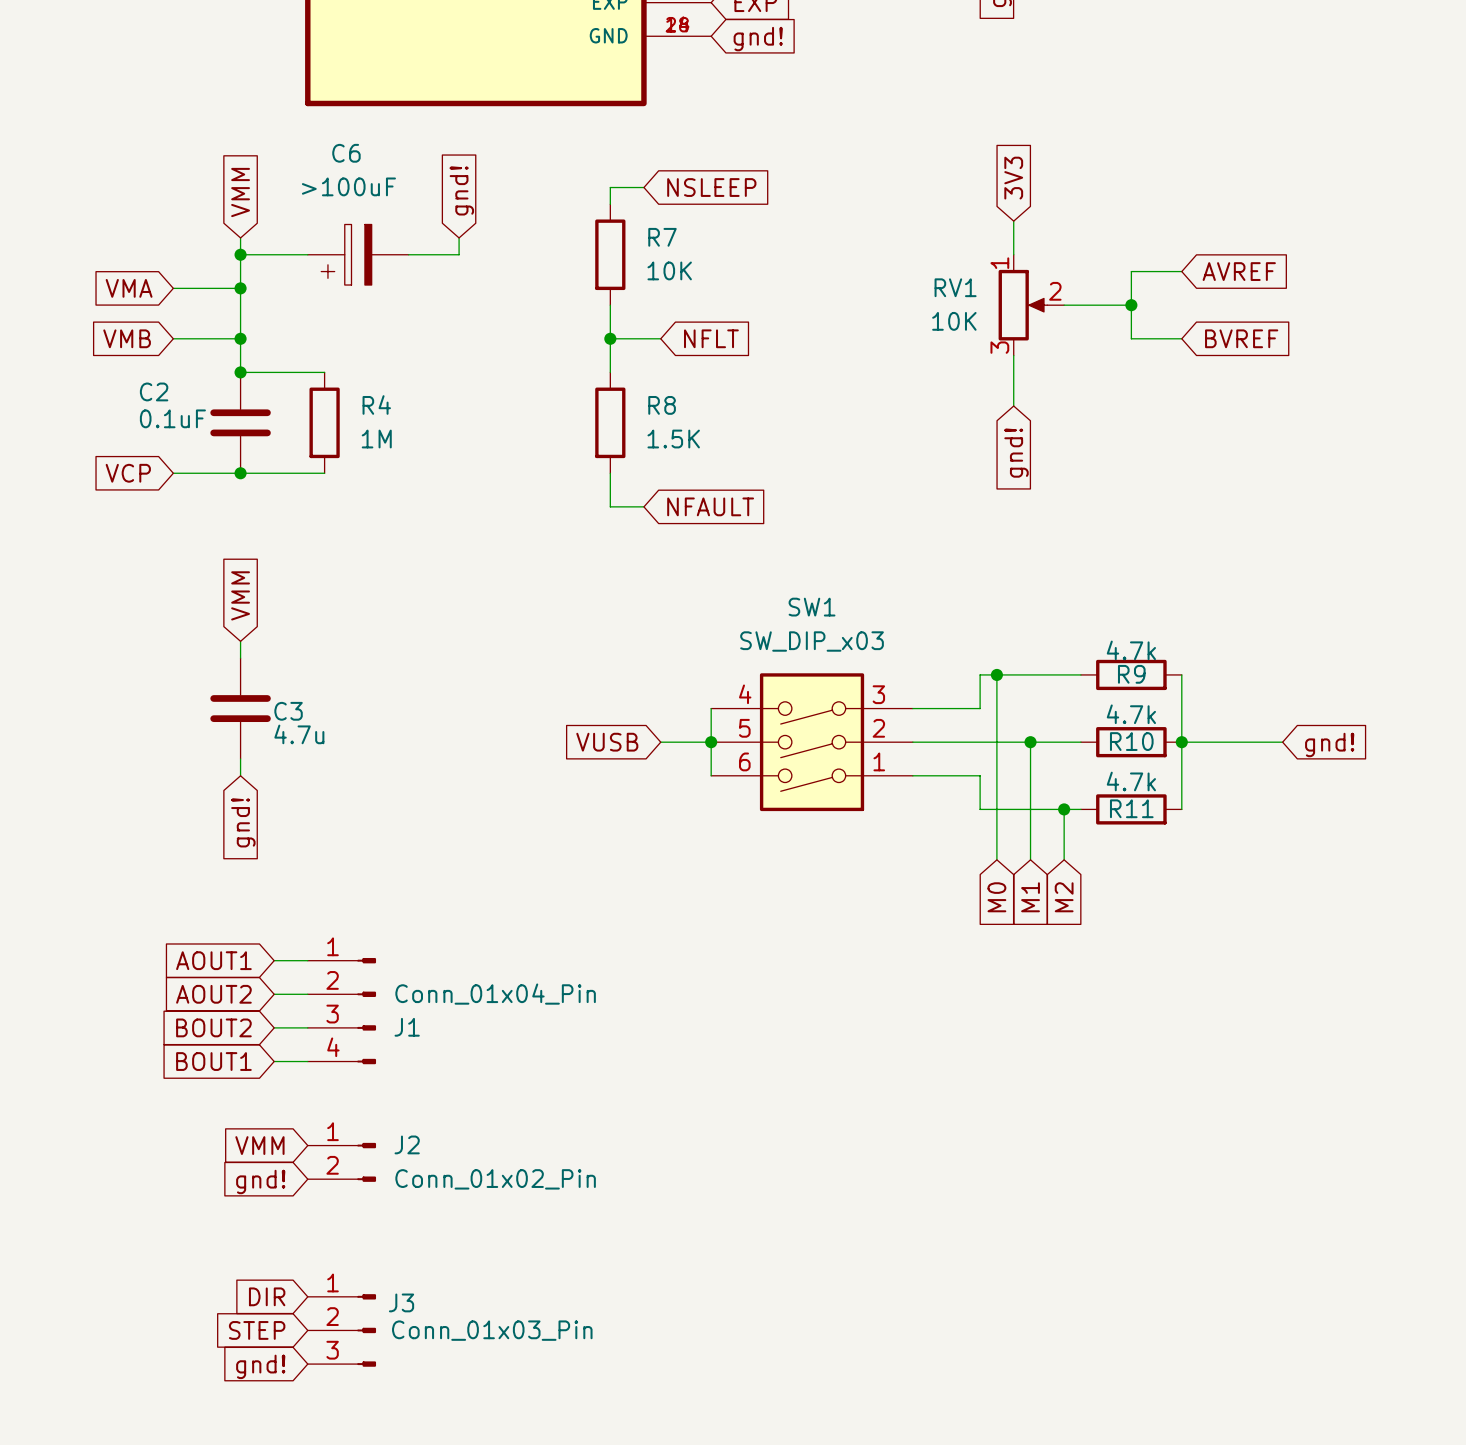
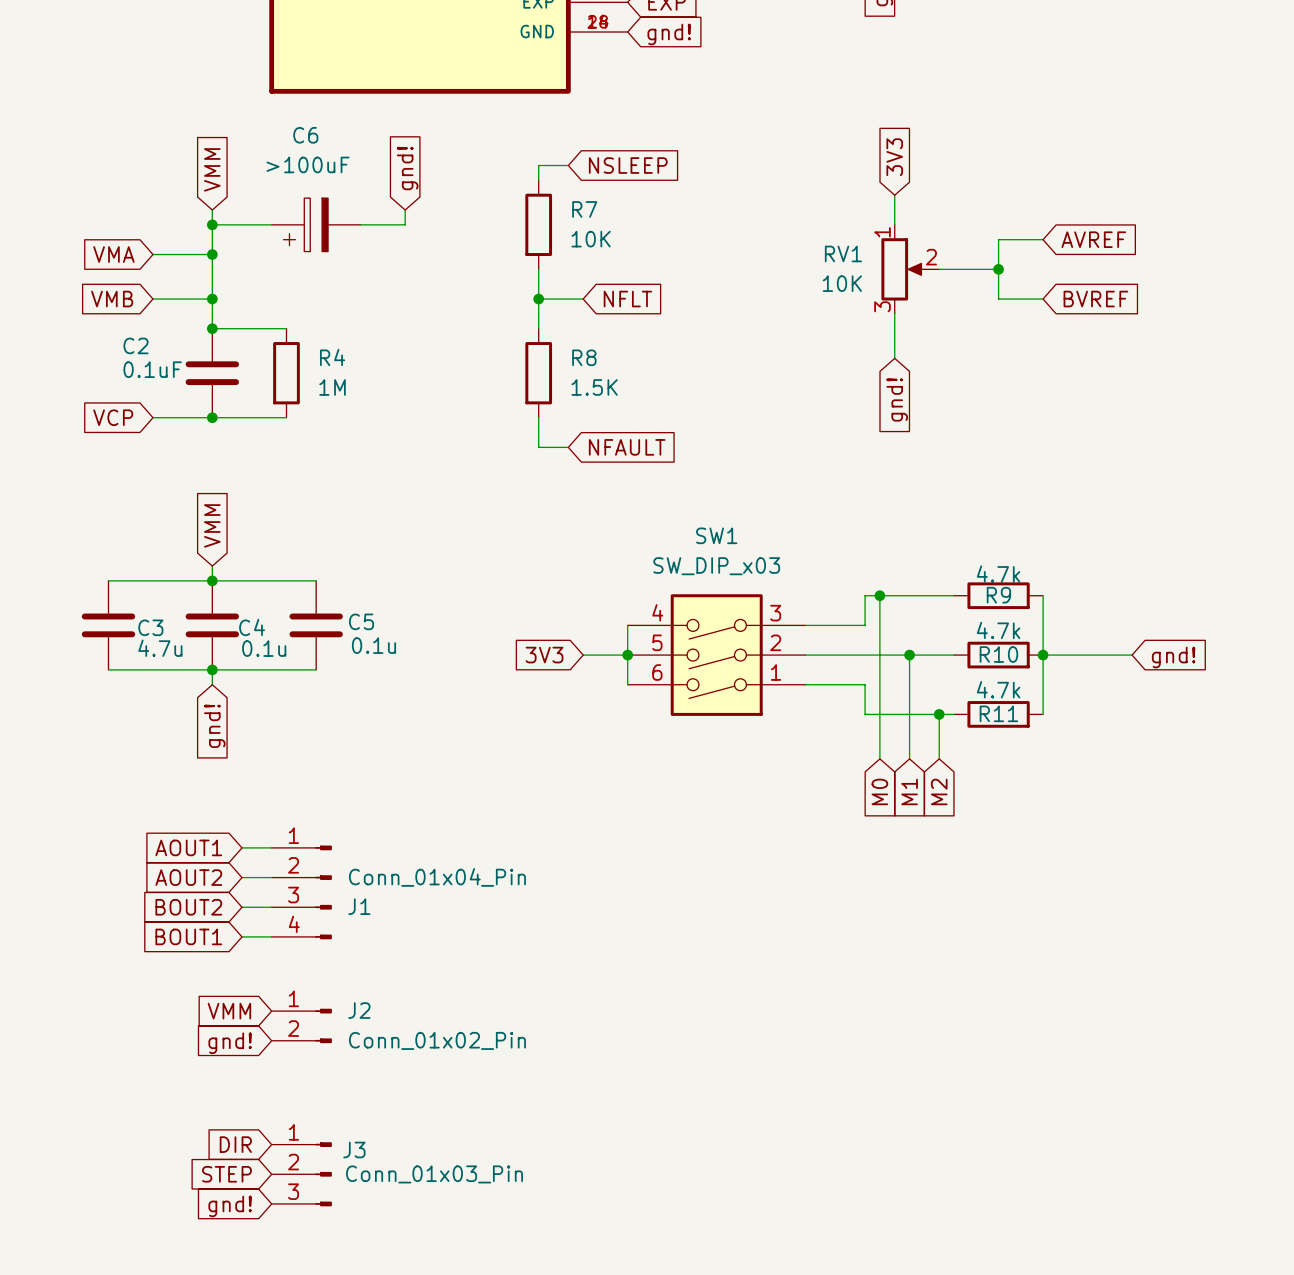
wire: none -> (108, 580) (316, 580)
junction: none -> (212, 580)
C3: none -> 4.7u (108, 625)
C5: none -> 0.1u (316, 625)
C3 name: C3 (288, 711) -> C4 (252, 627)
C3 value: 4.7u (299, 734) -> 0.1u (264, 648)
global label: VUSB (607, 742) -> 3V3 (544, 655)
wire: none -> (108, 669) (316, 669)
junction: none -> (212, 669)

